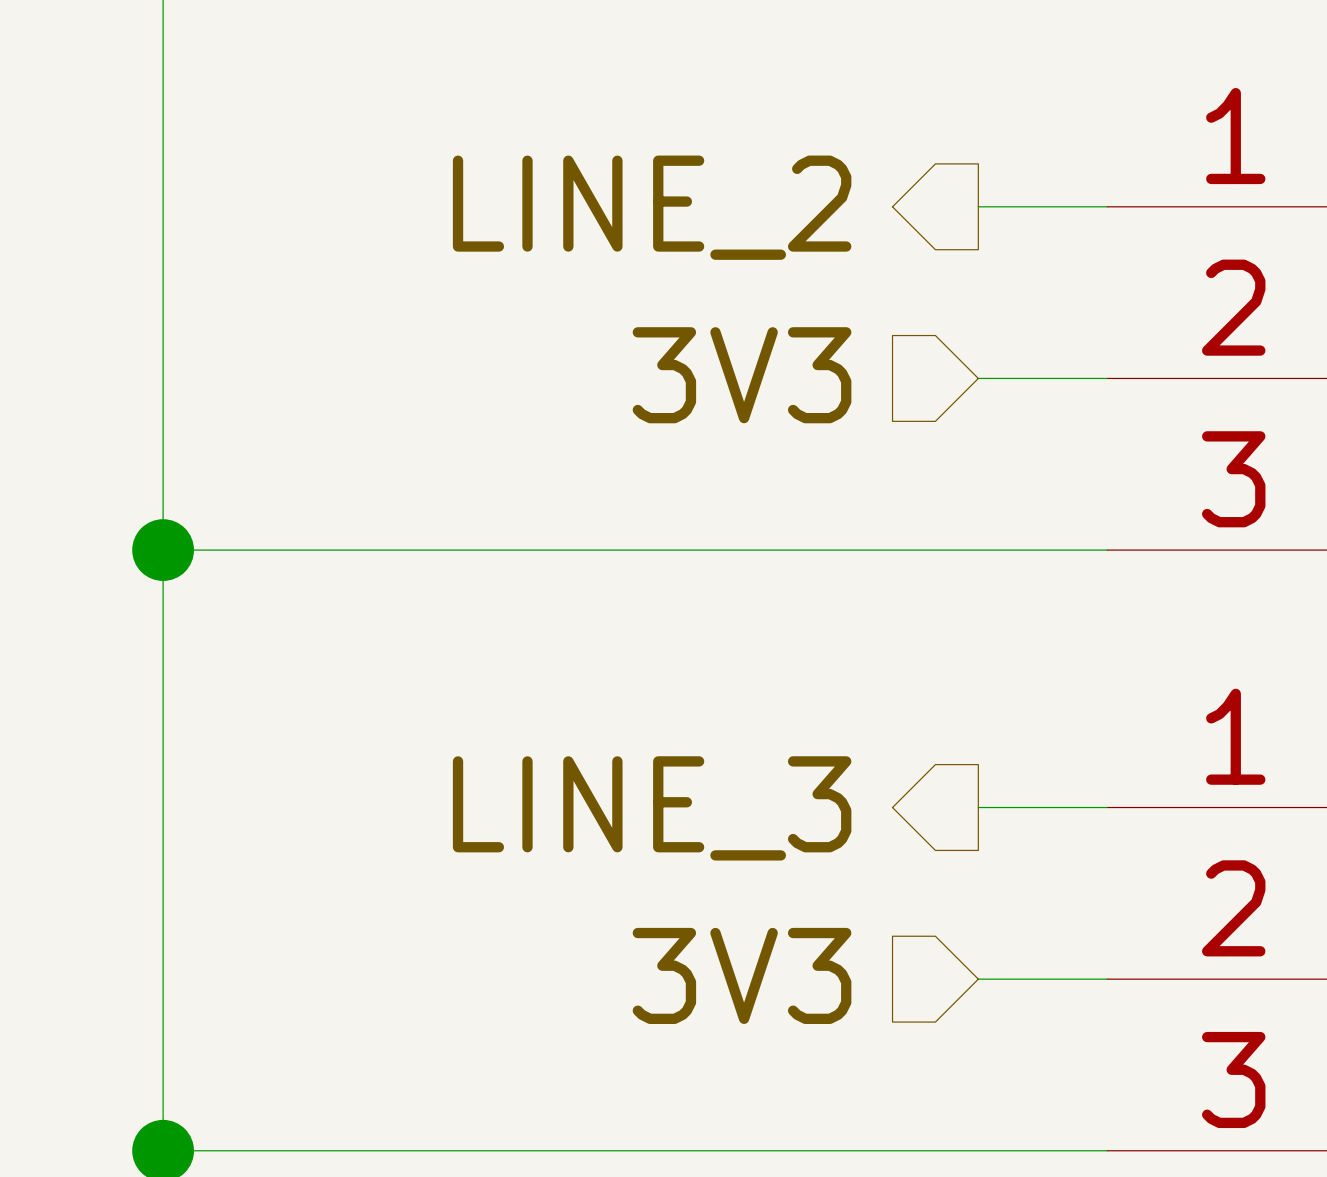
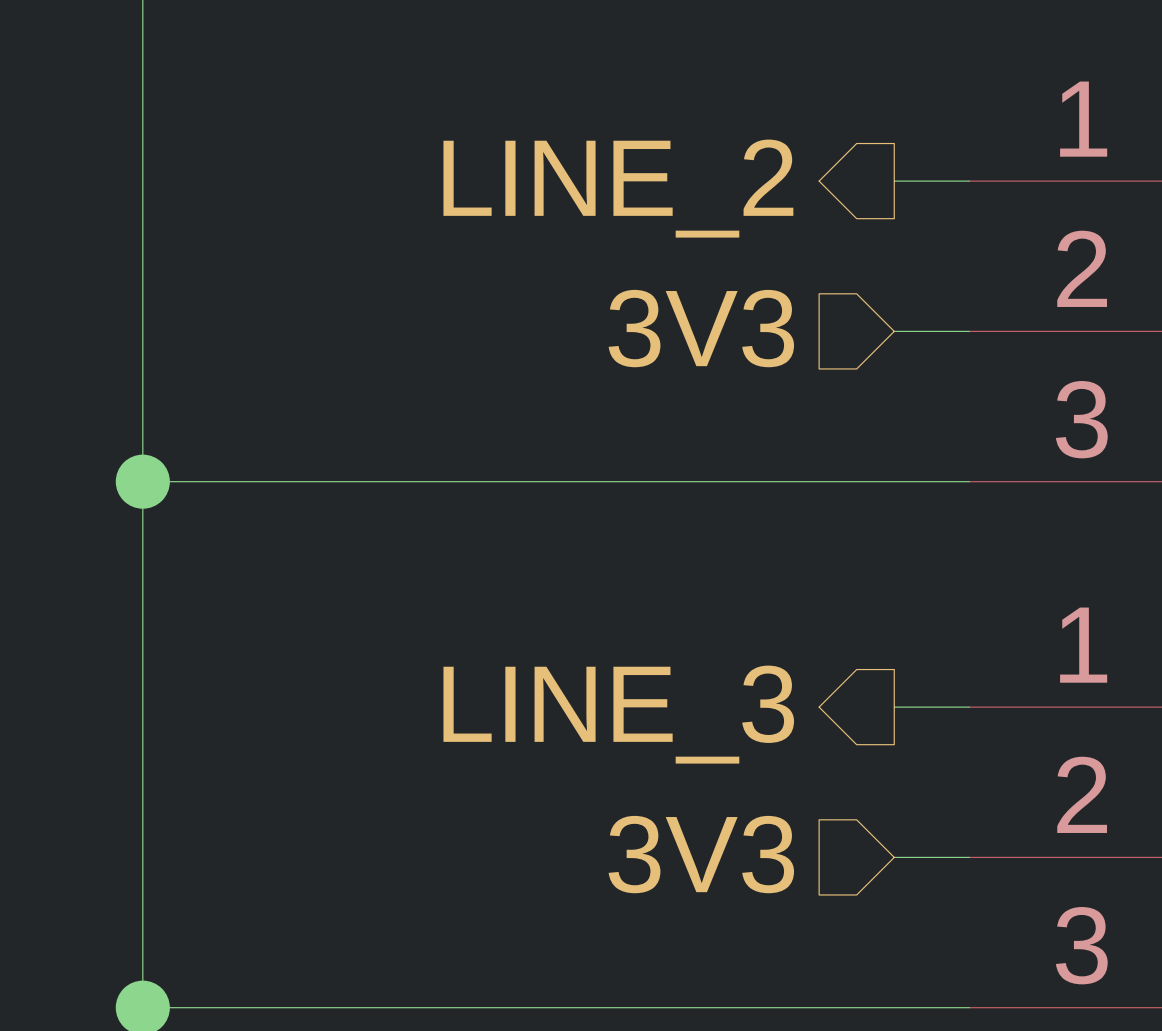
wire: (978, 206) (1021, 206) -> none
hierarchical label position: LINE_2 (652, 207) -> LINE_2 (618, 188)
hierarchical label position: 3V3 (742, 375) -> 3V3 (701, 328)
wire: (978, 378) (1021, 378) -> none
wire: (978, 807) (1021, 807) -> none
hierarchical label position: LINE_3 (652, 808) -> LINE_3 (618, 714)
hierarchical label position: 3V3 (742, 975) -> 3V3 (701, 854)
wire: (978, 979) (1021, 979) -> none

